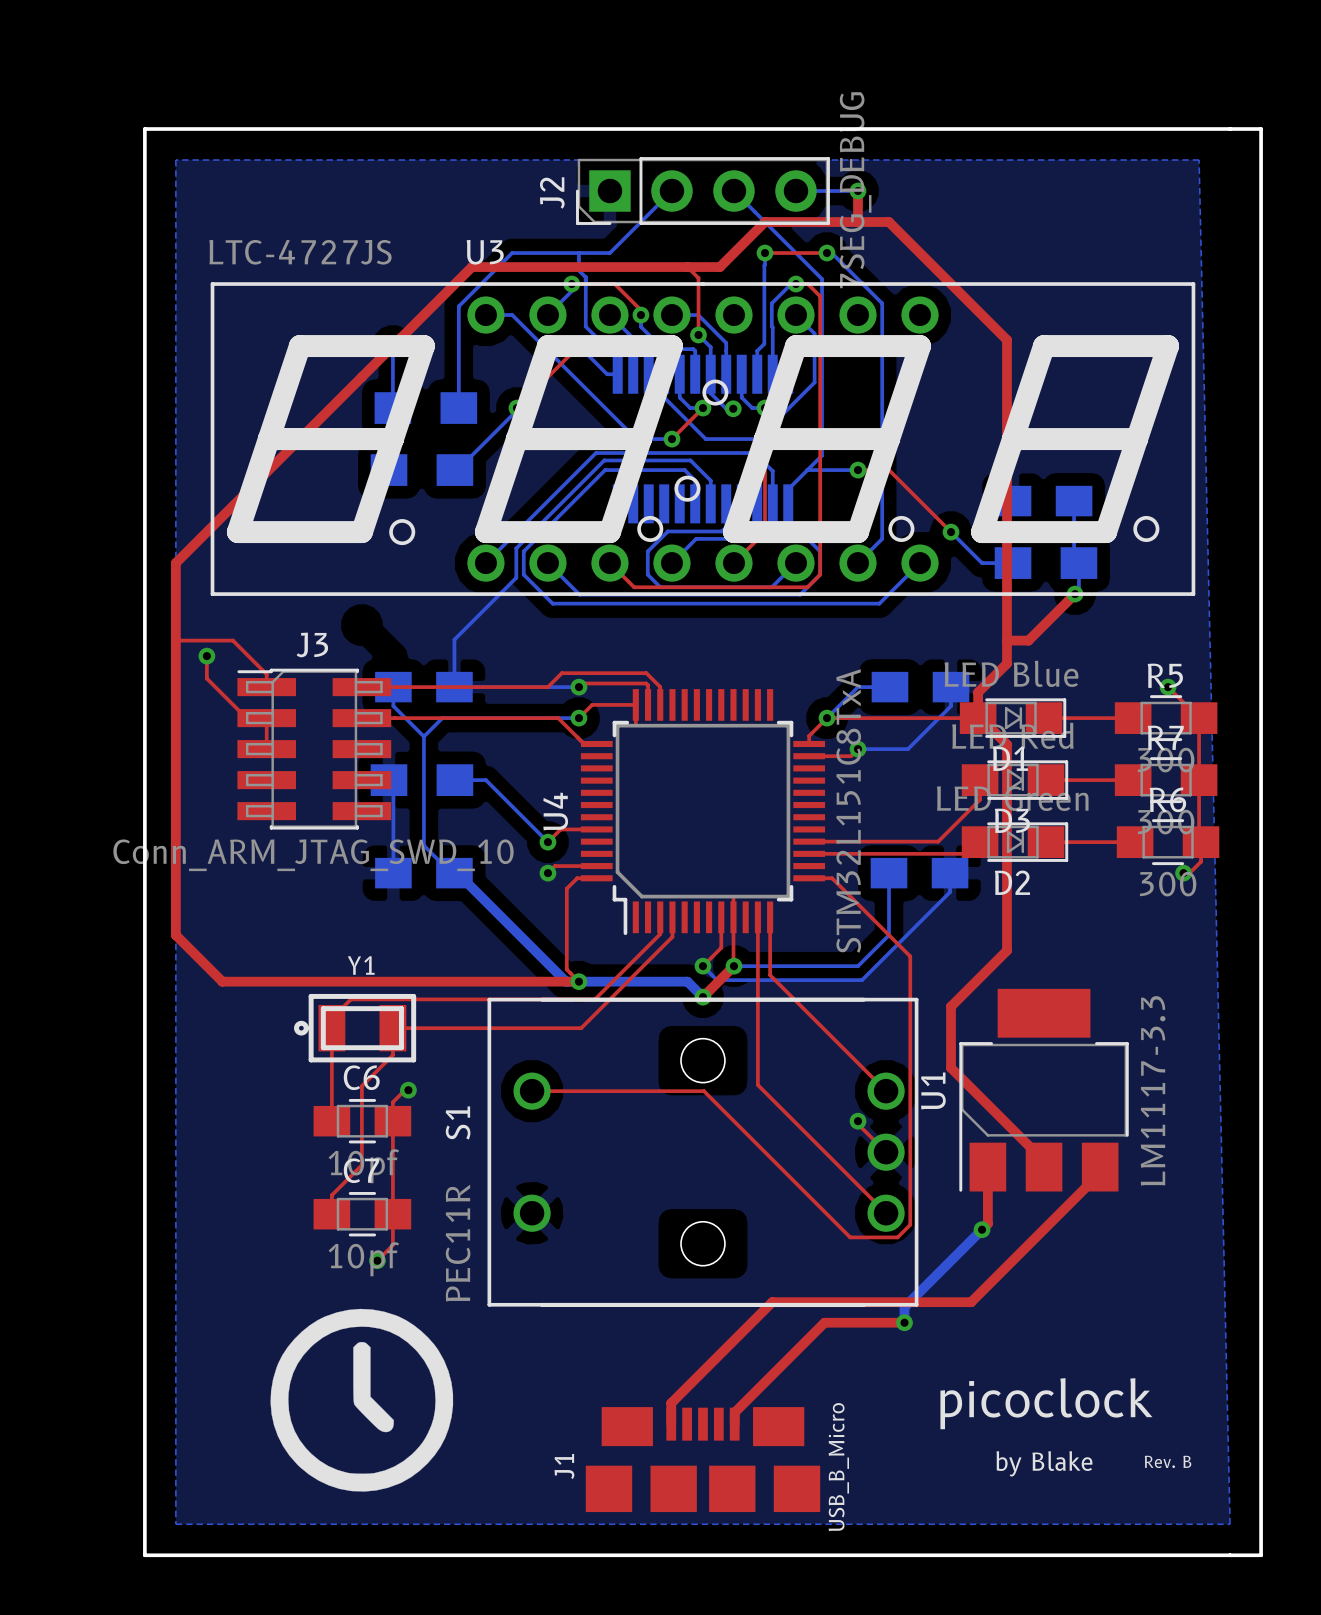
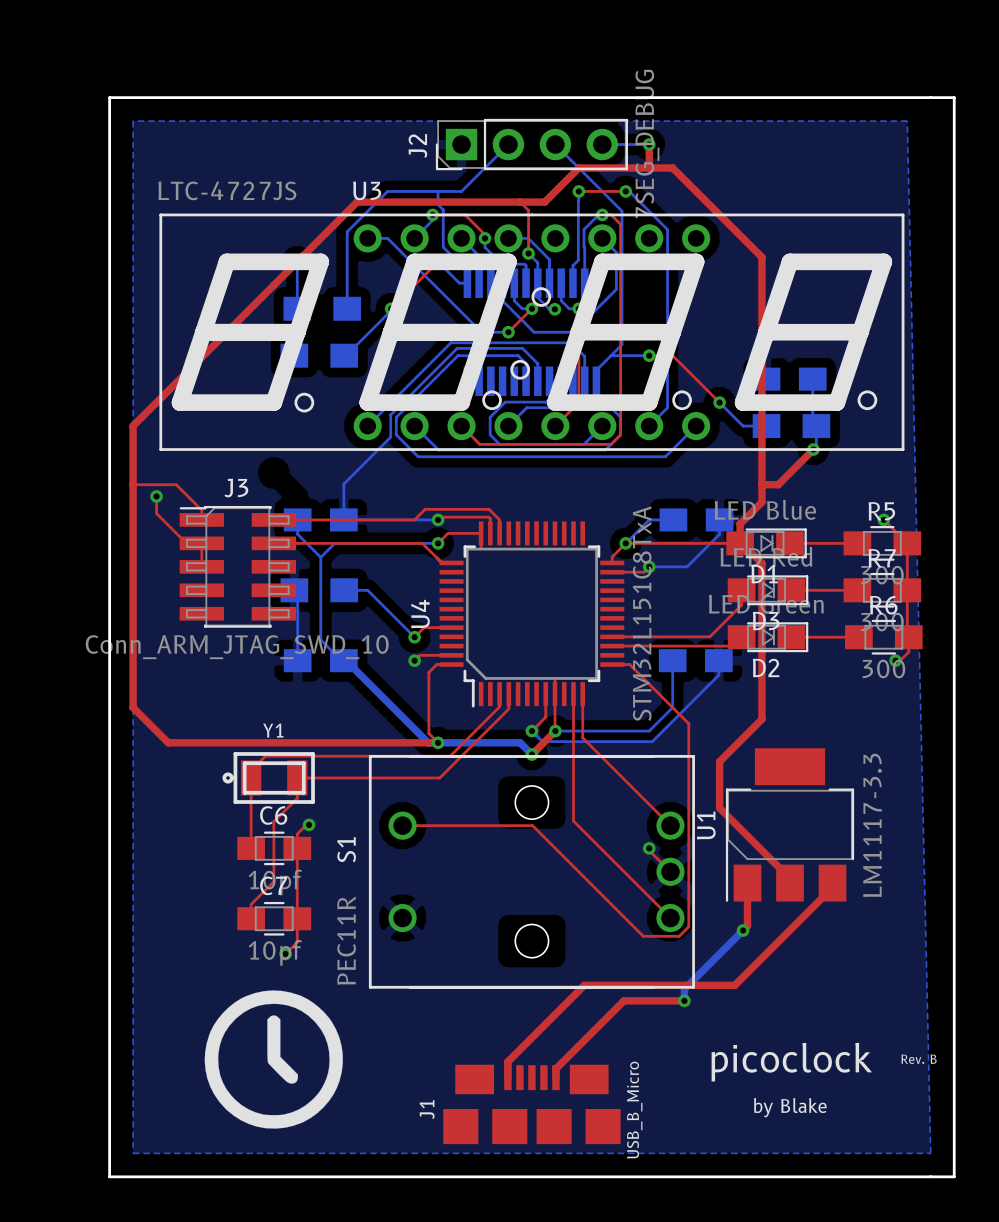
text position: Rev. B (1168, 1461) -> Rev. B (919, 1059)

